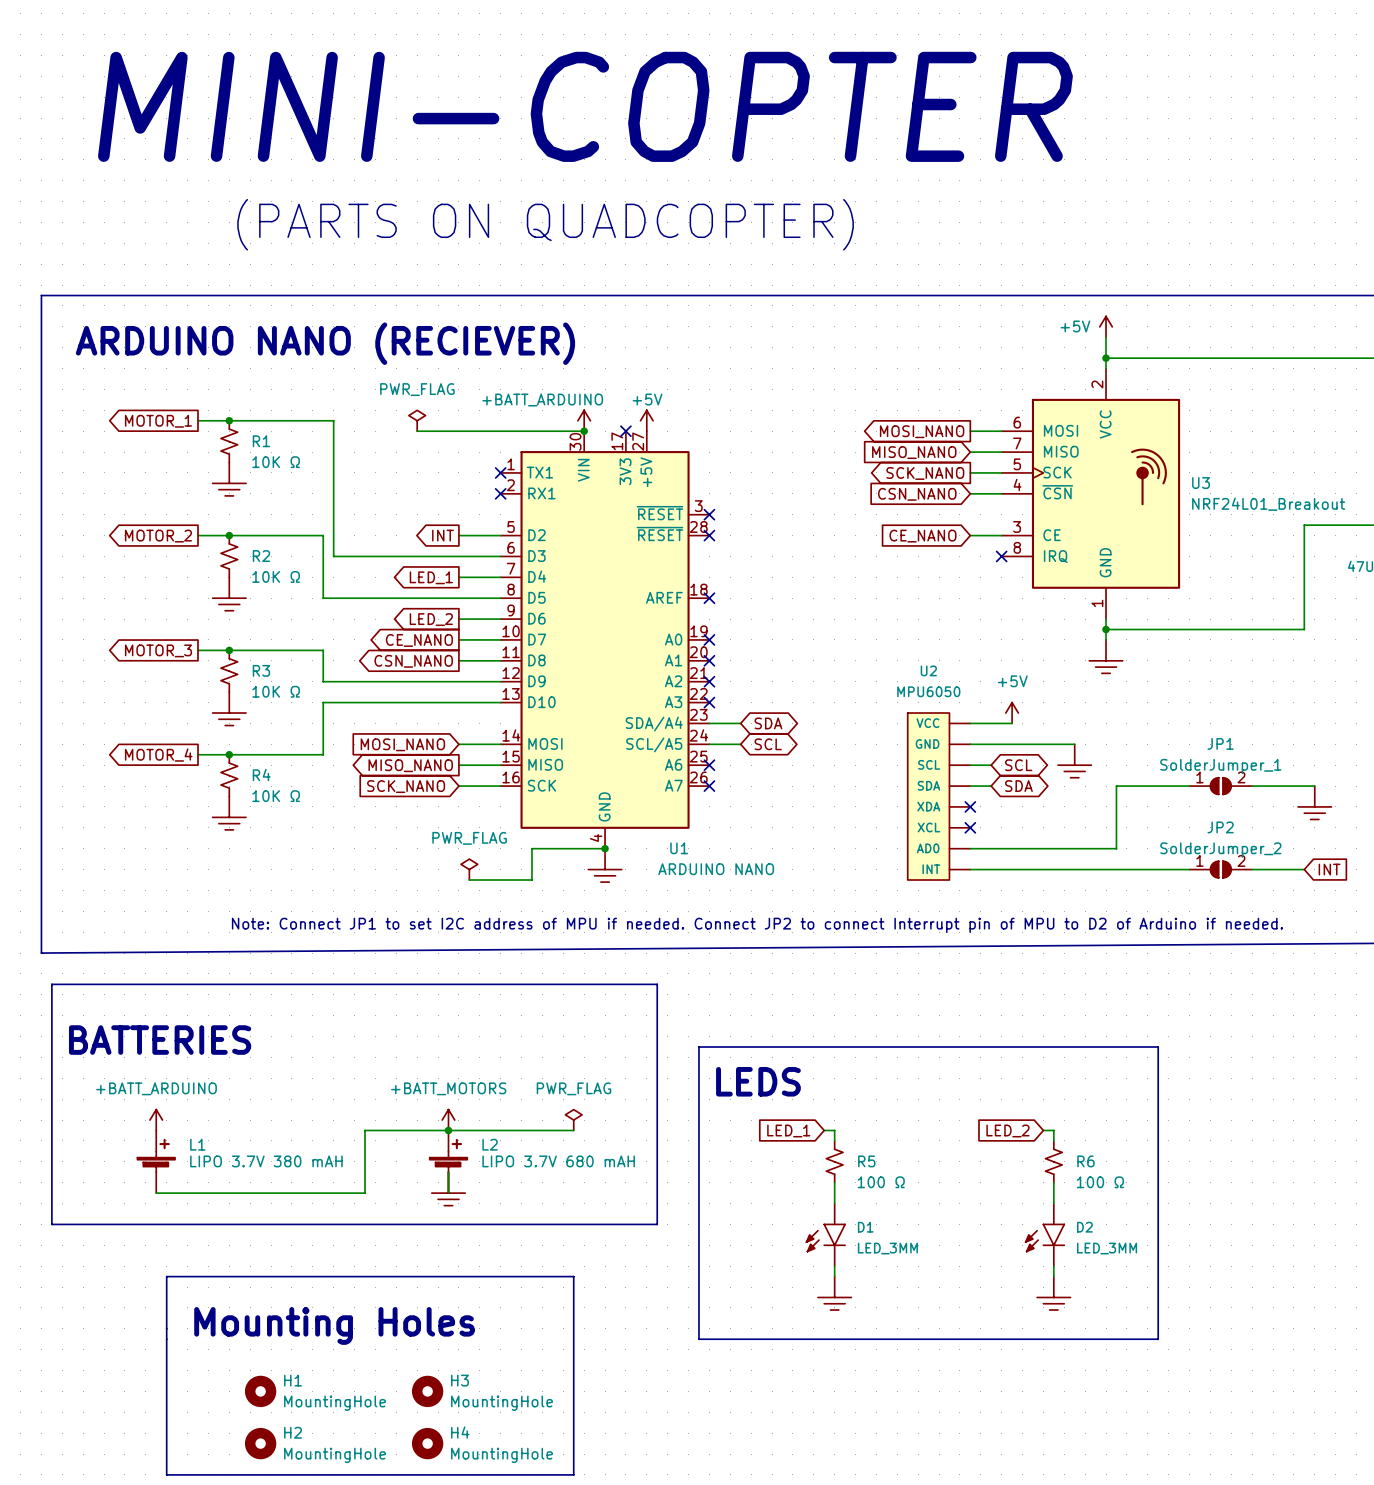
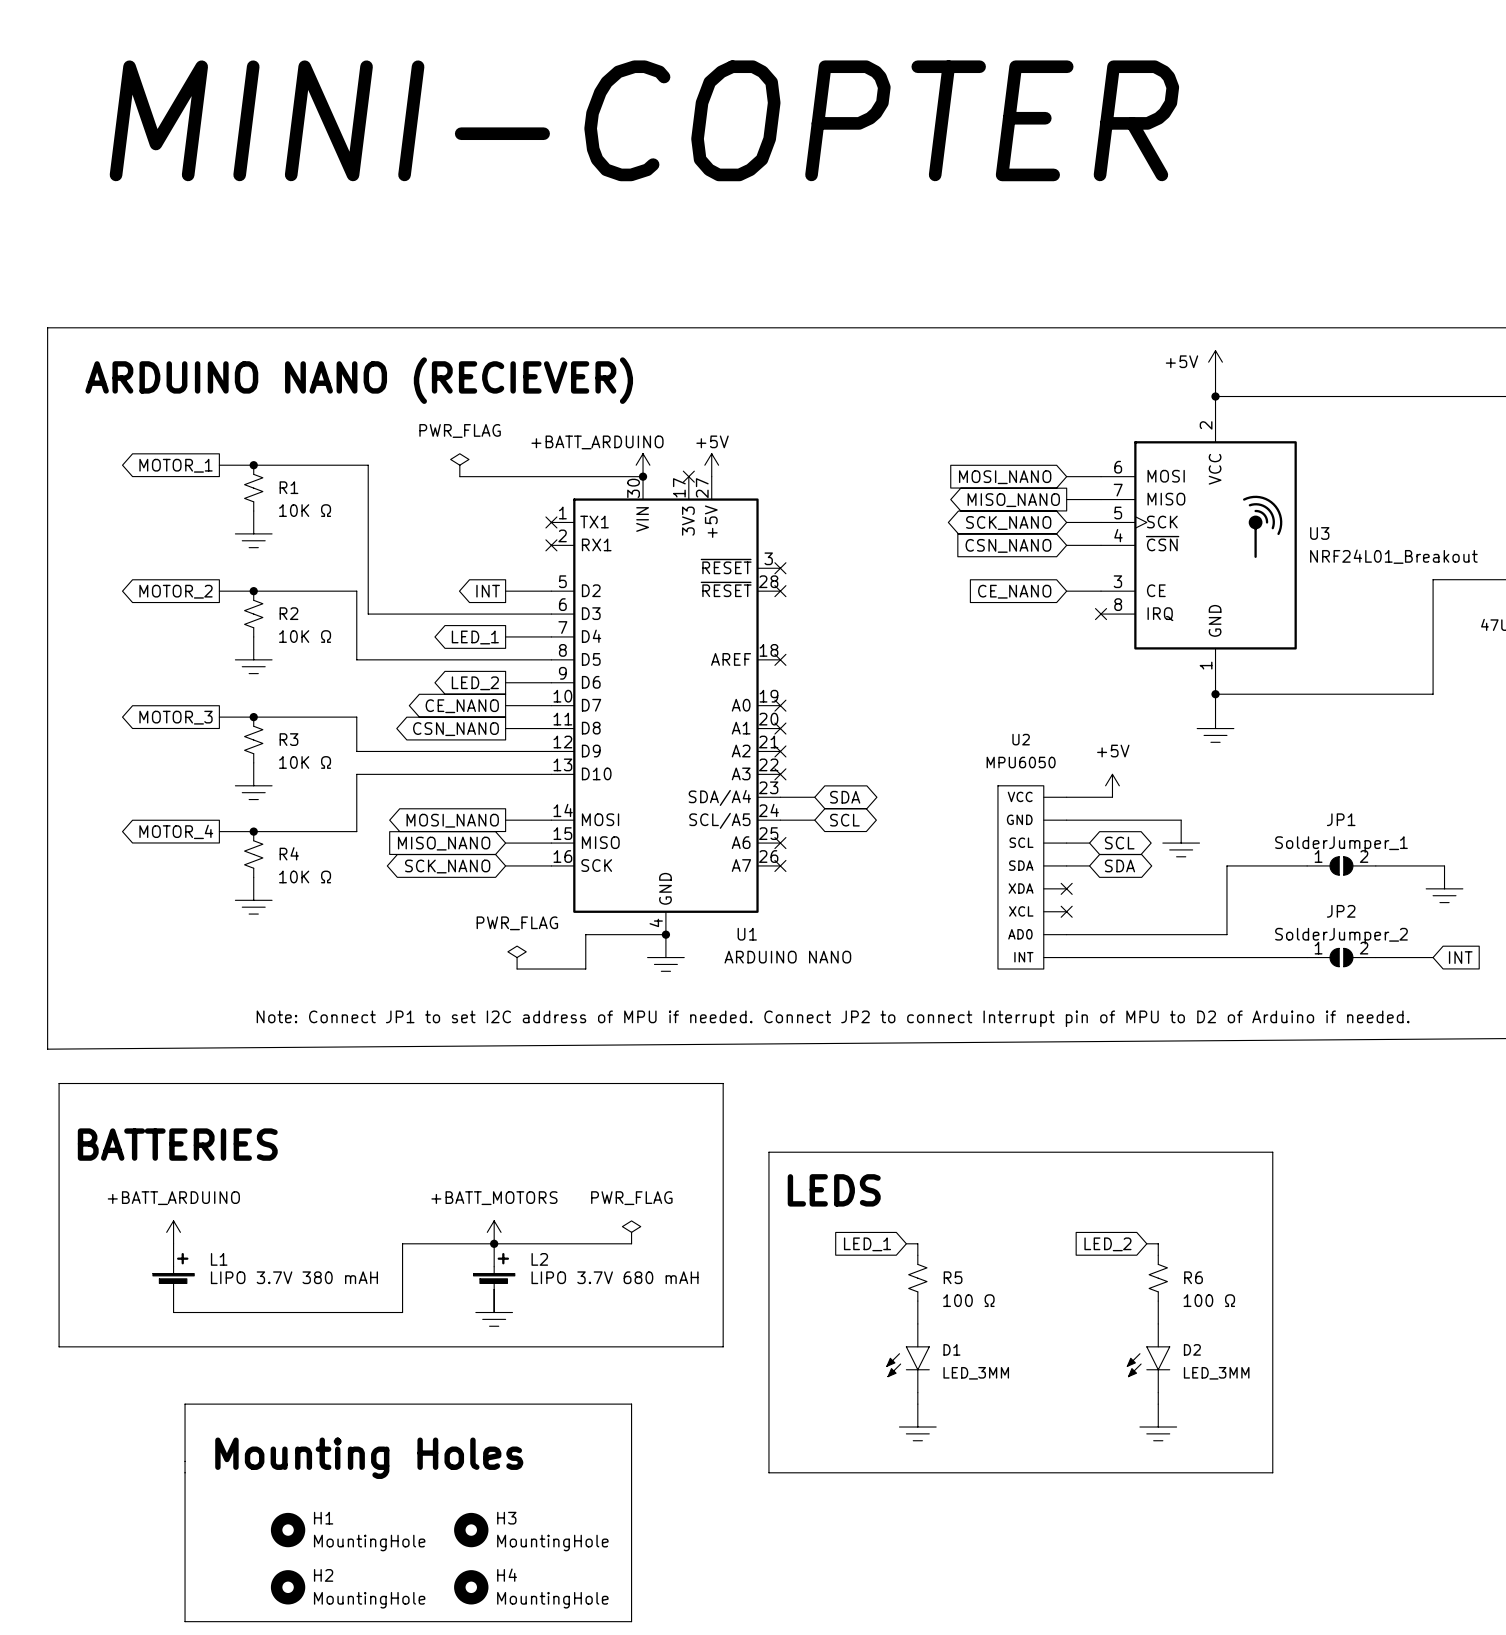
text: (PARTS ON QUADCOPTER) (545, 224) -> none
global label shape: output (922, 431) -> input (1005, 477)
global label shape: input (914, 452) -> output (1013, 500)
global label shape: output (925, 473) -> bidirectional (1008, 523)
global label shape: input (402, 744) -> output (452, 820)
global label shape: output (410, 765) -> input (444, 843)
global label shape: input (406, 786) -> bidirectional (447, 866)

